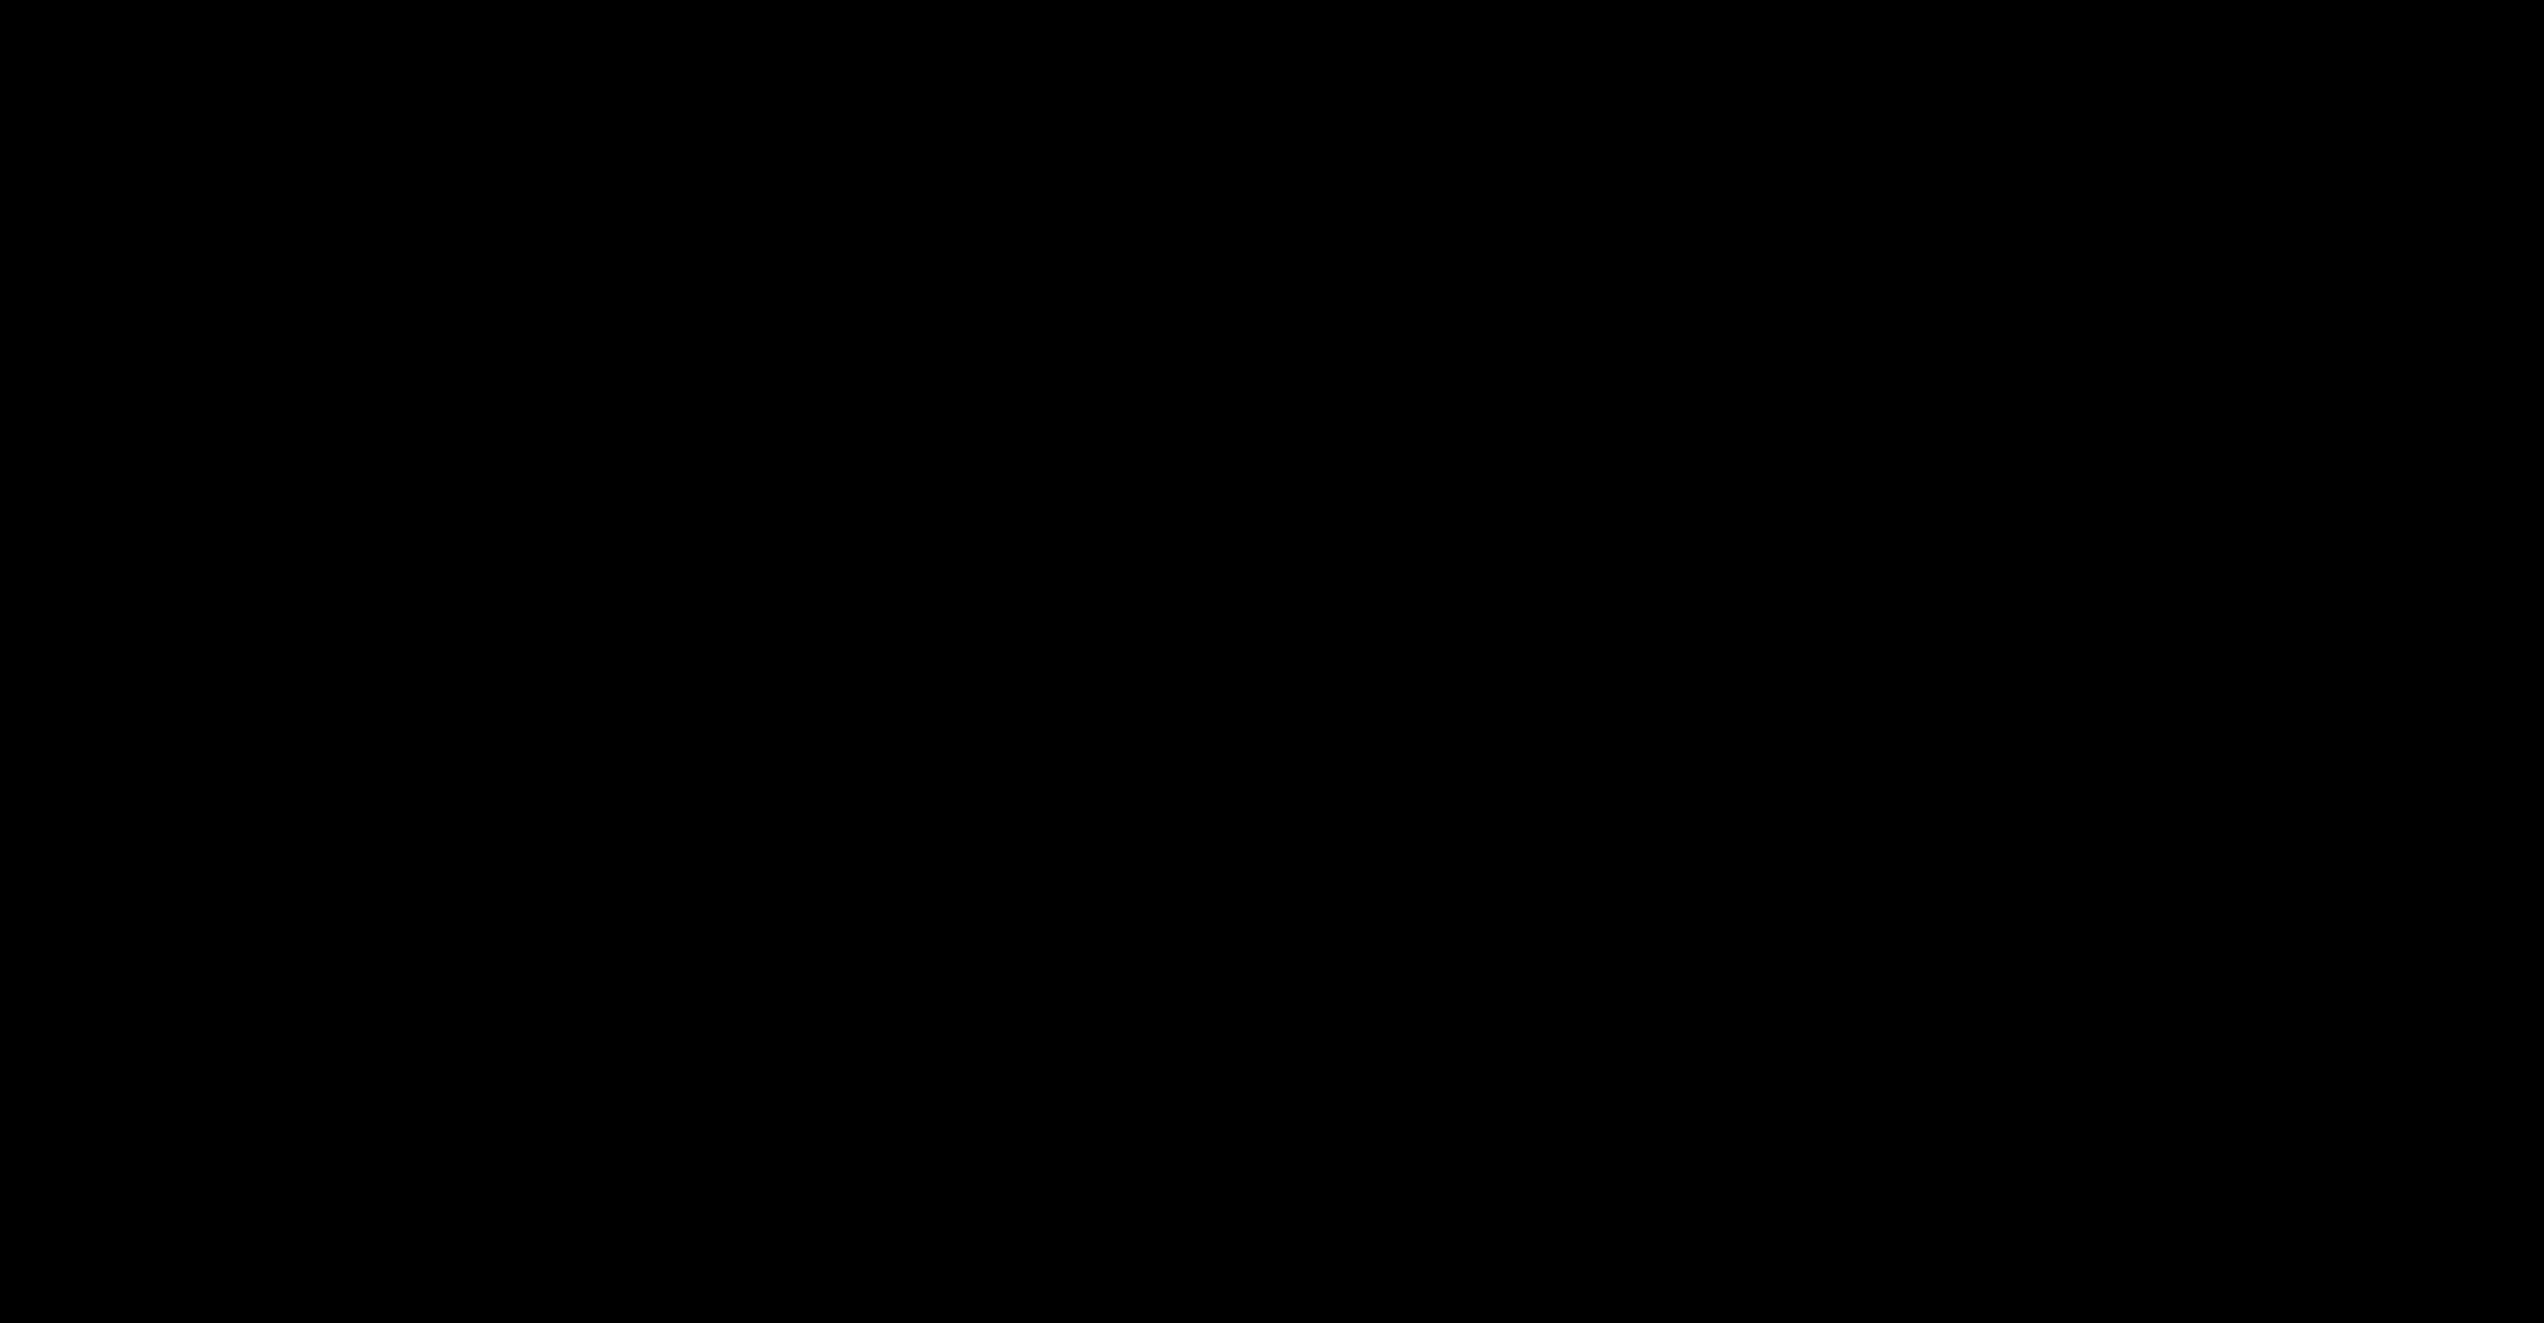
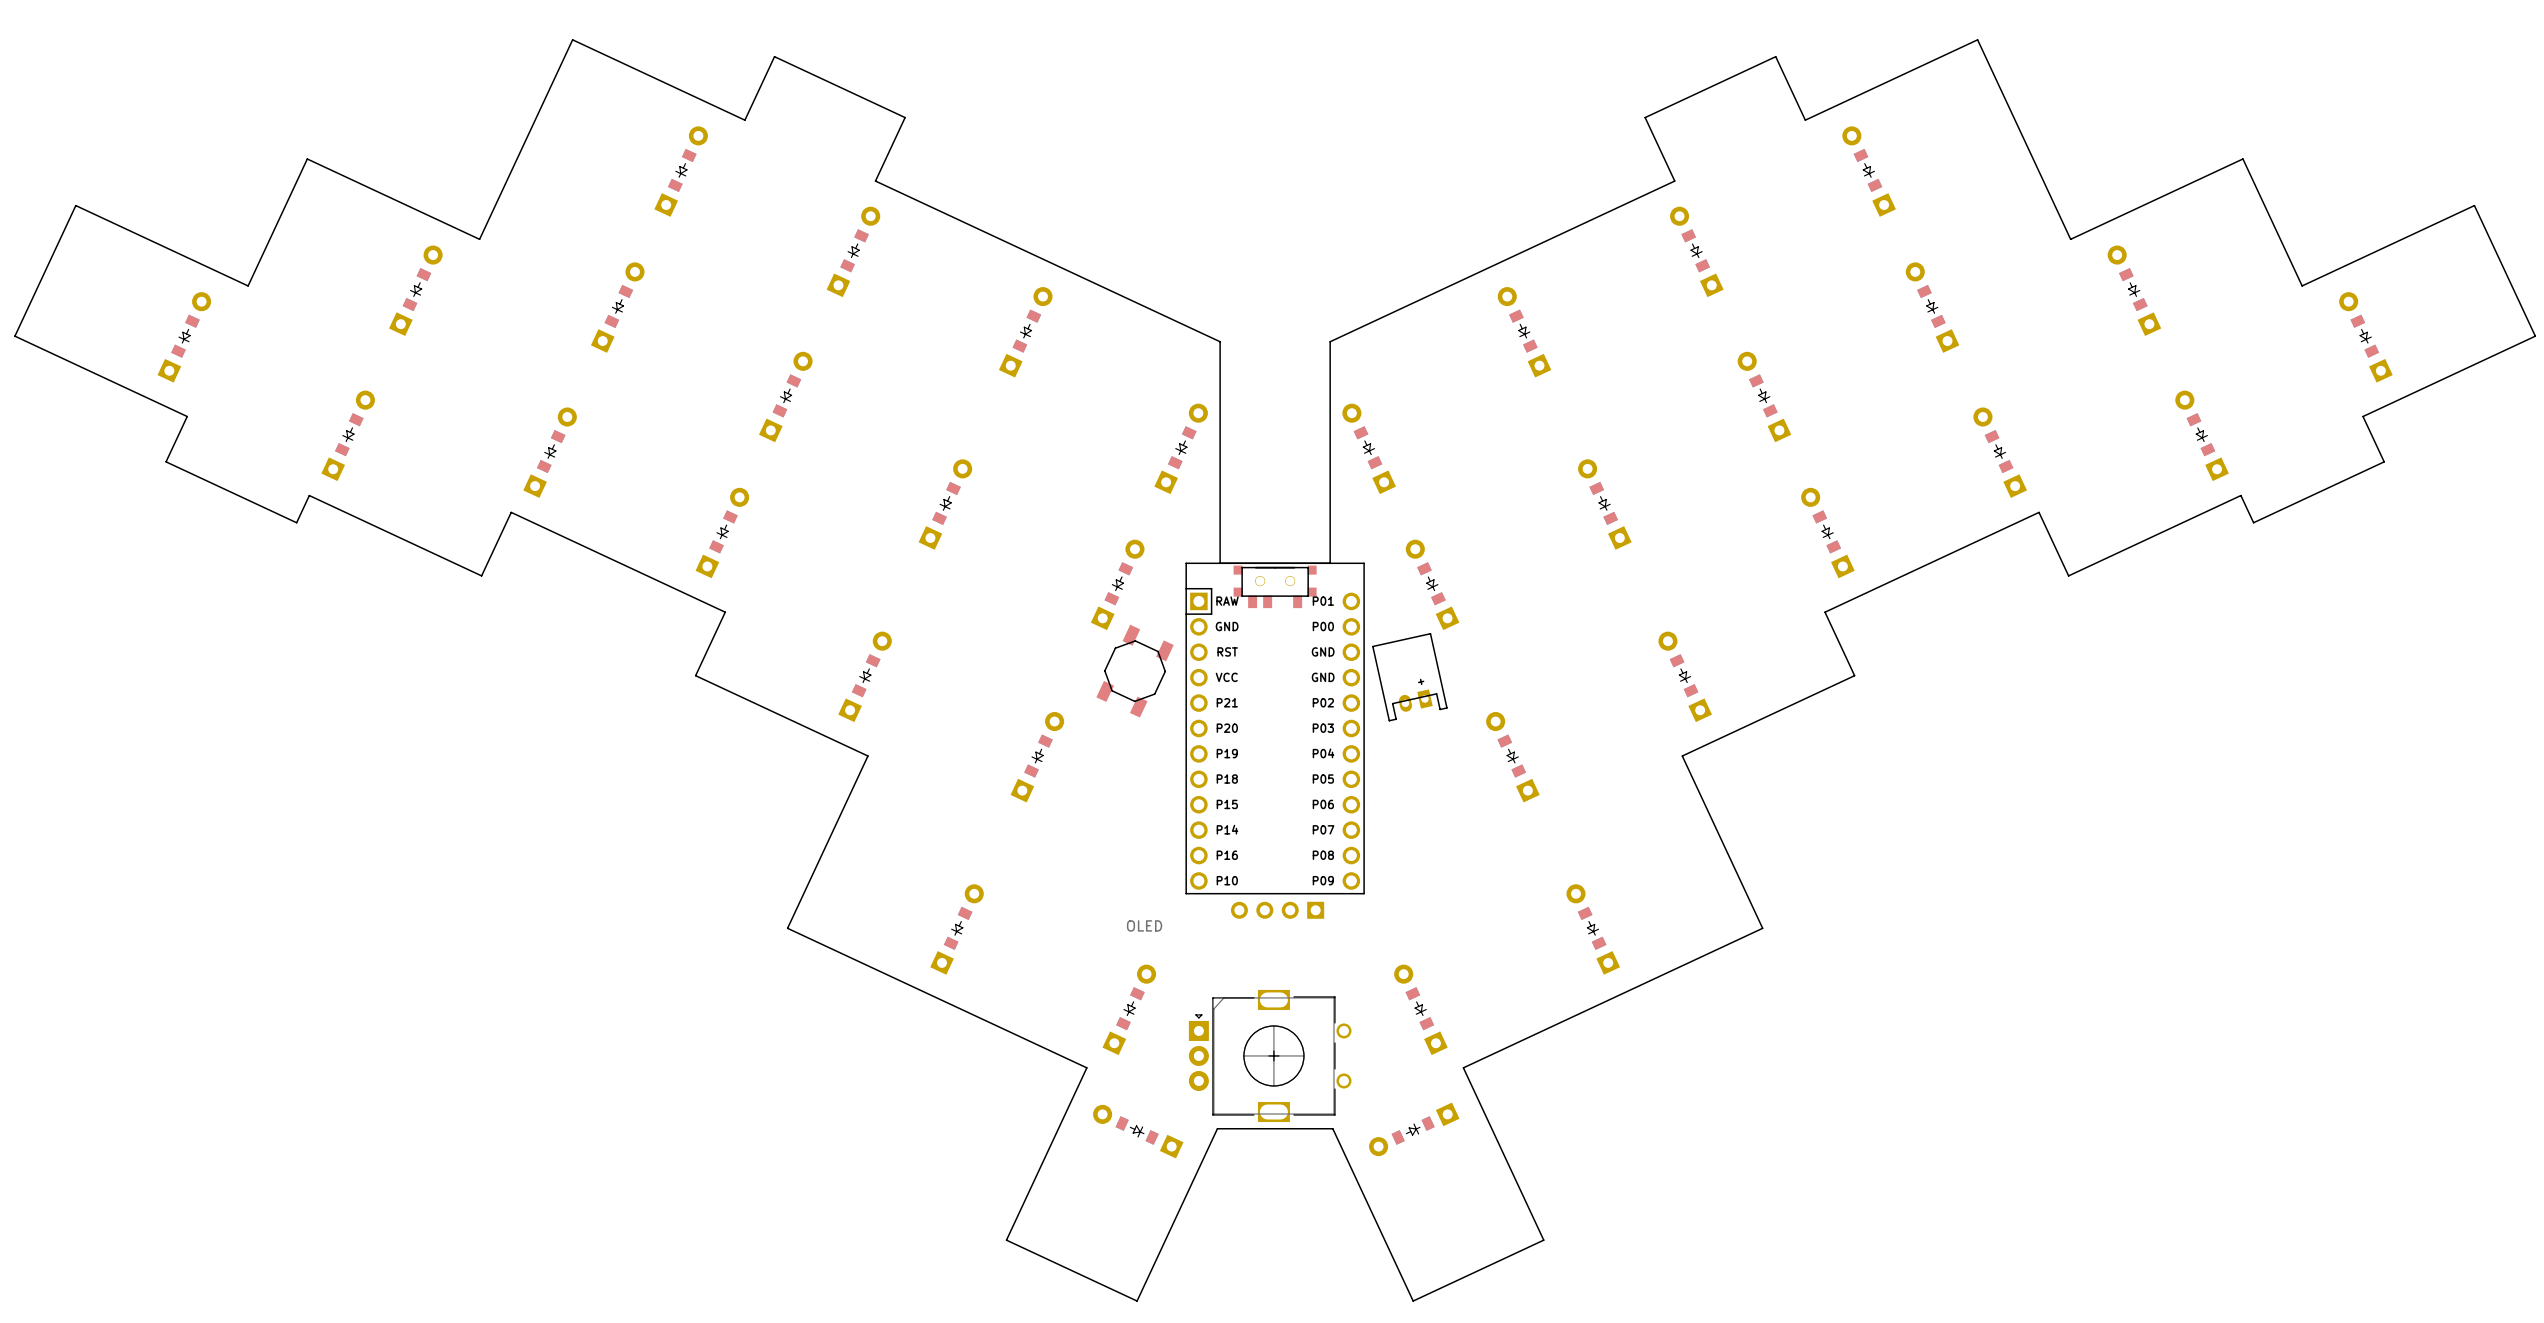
board edge: none -> (572, 39) (744, 120) (774, 56) (905, 117) (875, 181) (1220, 341) (1220, 563) (1330, 563) (1330, 341) (1674, 181) (1645, 117) (1775, 56) (1805, 120) (1977, 39) (2070, 239) (2242, 158) (2302, 285) (2474, 205) (2535, 336) (2363, 416) (2384, 461) (2253, 522) (2240, 495) (2068, 575) (2039, 512) (1825, 612) (1854, 675) (1682, 756) (1762, 928) (1463, 1067) (1543, 1240) (1413, 1301) (1332, 1128) (1217, 1128) (1137, 1301) (1006, 1240) (1086, 1067) (787, 928) (867, 756) (695, 675) (725, 612) (511, 512) (481, 575) (309, 495) (296, 522) (166, 461) (187, 416) (14, 336) (75, 205) (248, 285) (307, 158) (479, 239) (572, 39)
part: none -> (681, 171)
part: none -> (1869, 171)
part: none -> (853, 251)
part: none -> (1696, 251)
part: none -> (415, 290)
part: none -> (2134, 290)
part: none -> (617, 307)
part: none -> (1932, 307)
part: none -> (1025, 332)
part: none -> (1524, 332)
part: none -> (184, 337)
part: none -> (2365, 337)
part: none -> (785, 397)
part: none -> (1764, 397)
part: none -> (348, 435)
part: none -> (2202, 435)
part: none -> (1181, 448)
part: none -> (1369, 448)
part: none -> (550, 452)
part: none -> (2000, 452)
part: none -> (945, 504)
part: none -> (1604, 504)
part: none -> (722, 533)
part: none -> (1827, 533)
part: none -> (1117, 584)
part: none -> (1432, 584)
part: none -> (1275, 586)
part: none -> (1135, 671)
part: none -> (865, 676)
part: none -> (1685, 676)
part: none -> (1409, 677)
part: none -> (1275, 728)
part: none -> (1037, 757)
part: none -> (1512, 757)
part: none -> OLED (1277, 910)
part: none -> (957, 929)
part: none -> (1593, 929)
part: none -> (1129, 1009)
part: none -> (1420, 1009)
part: none -> (1270, 1055)
part: none -> (1414, 1129)
part: none -> (1138, 1131)

